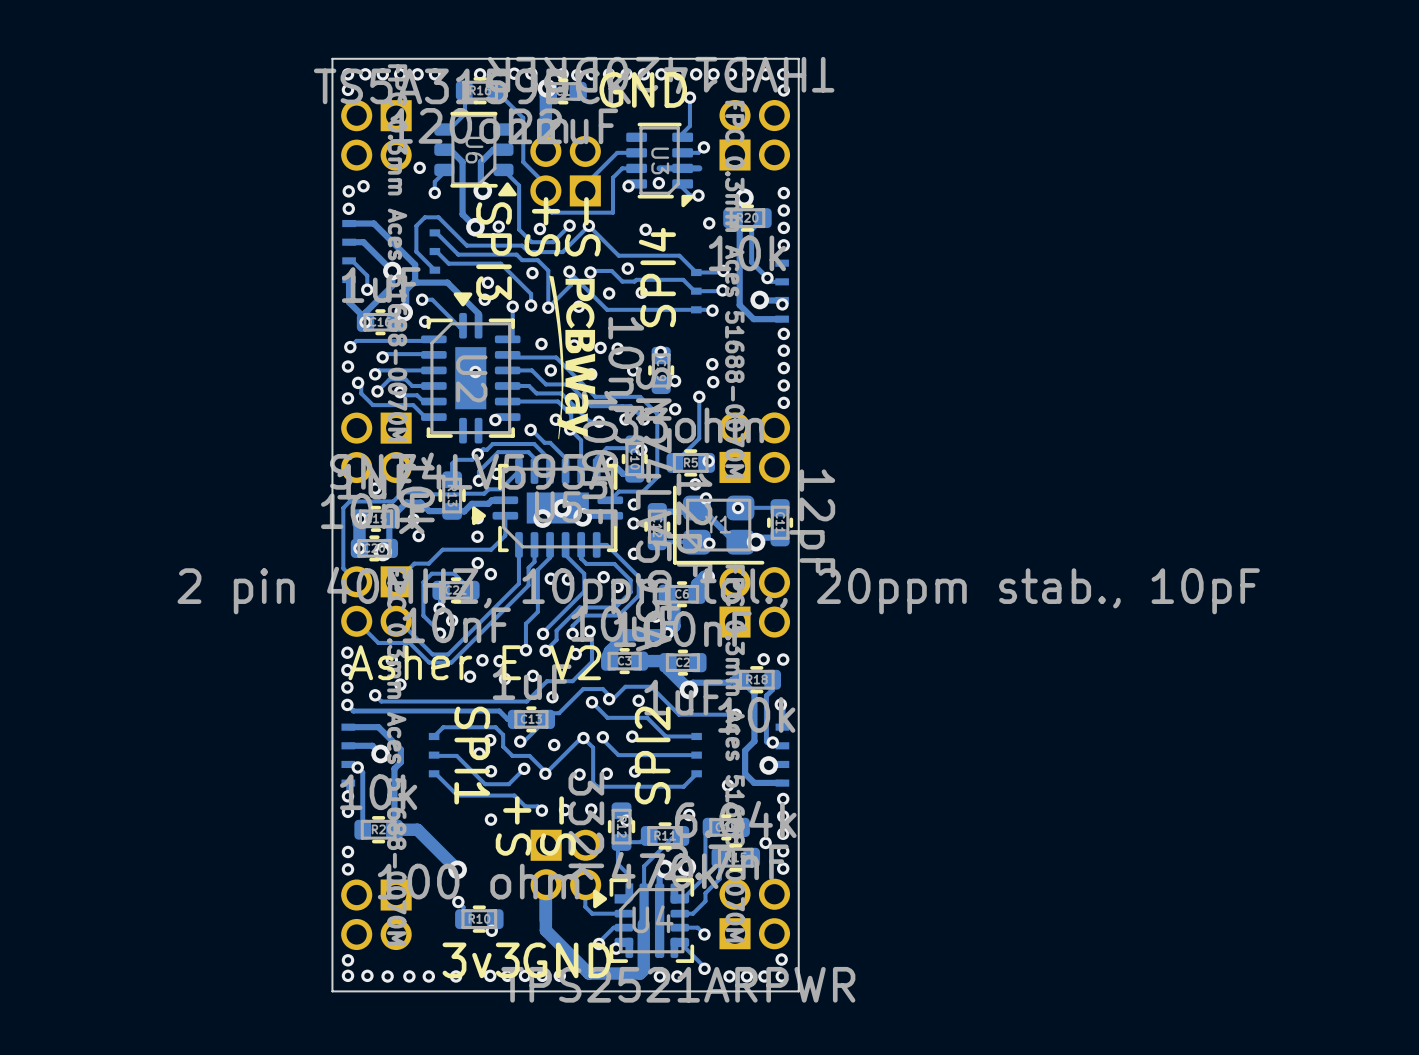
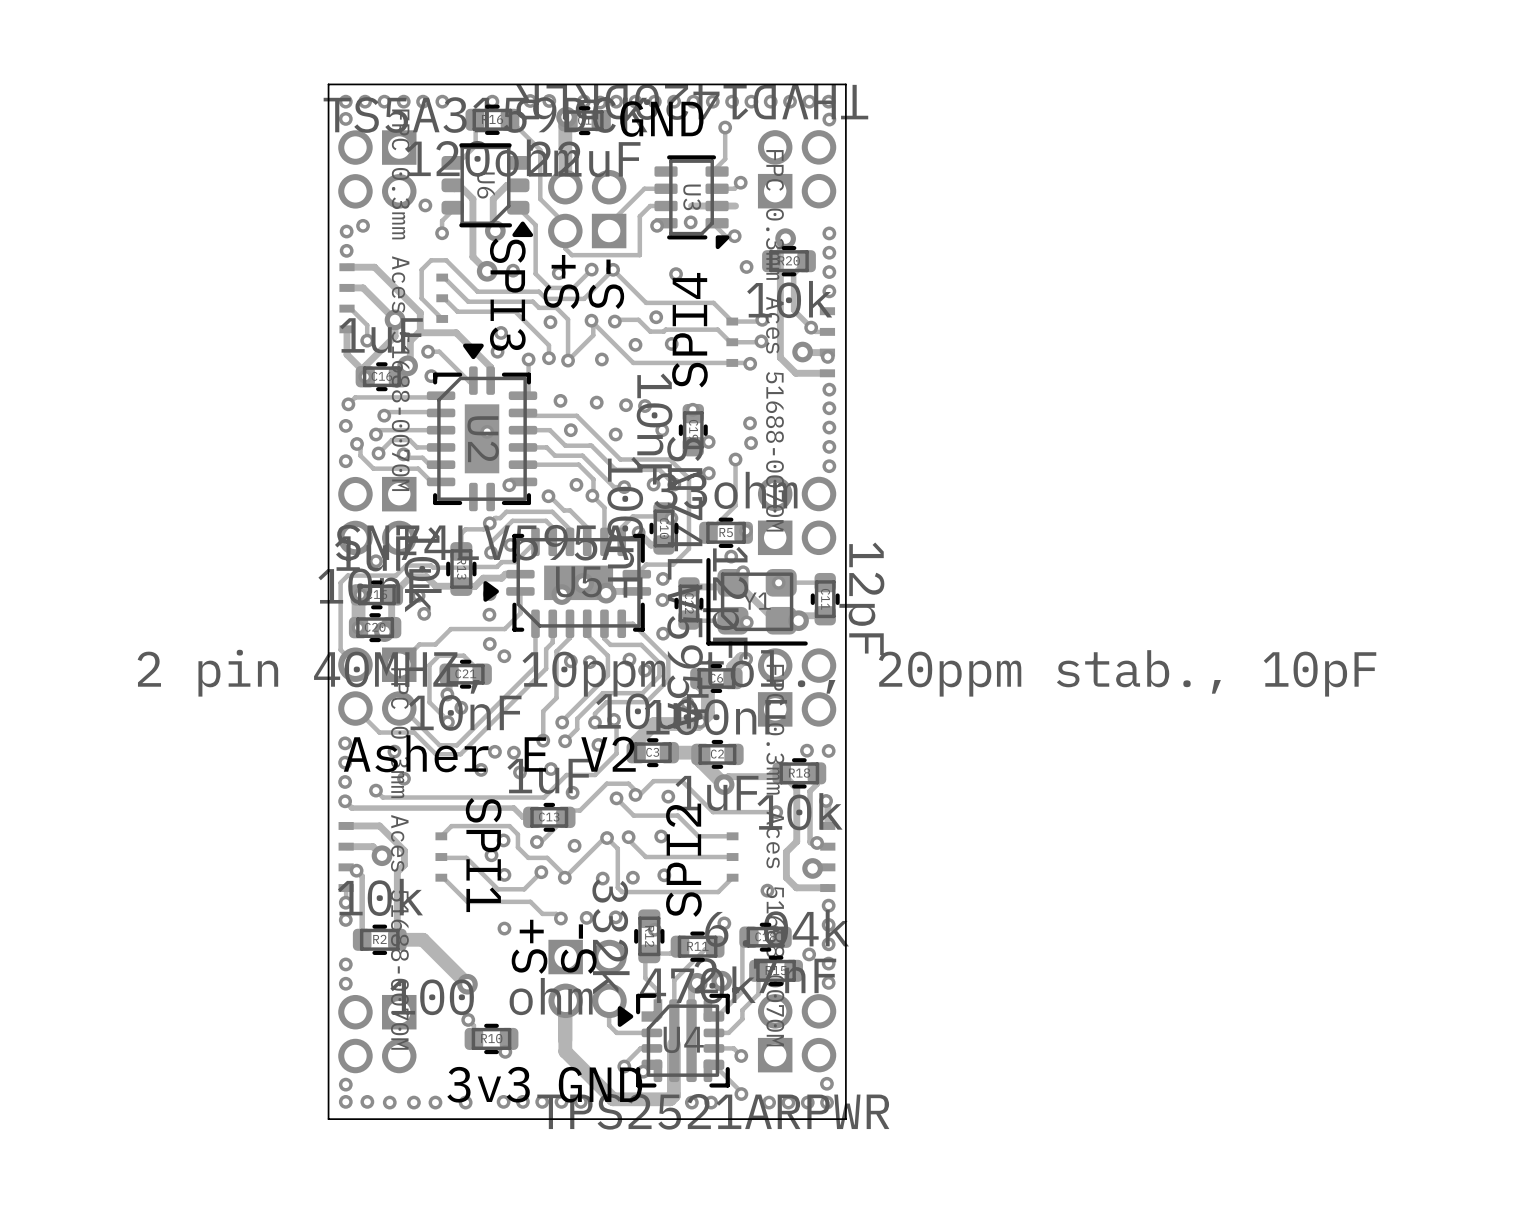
drawing: [549, 275, 596, 440] -> none

